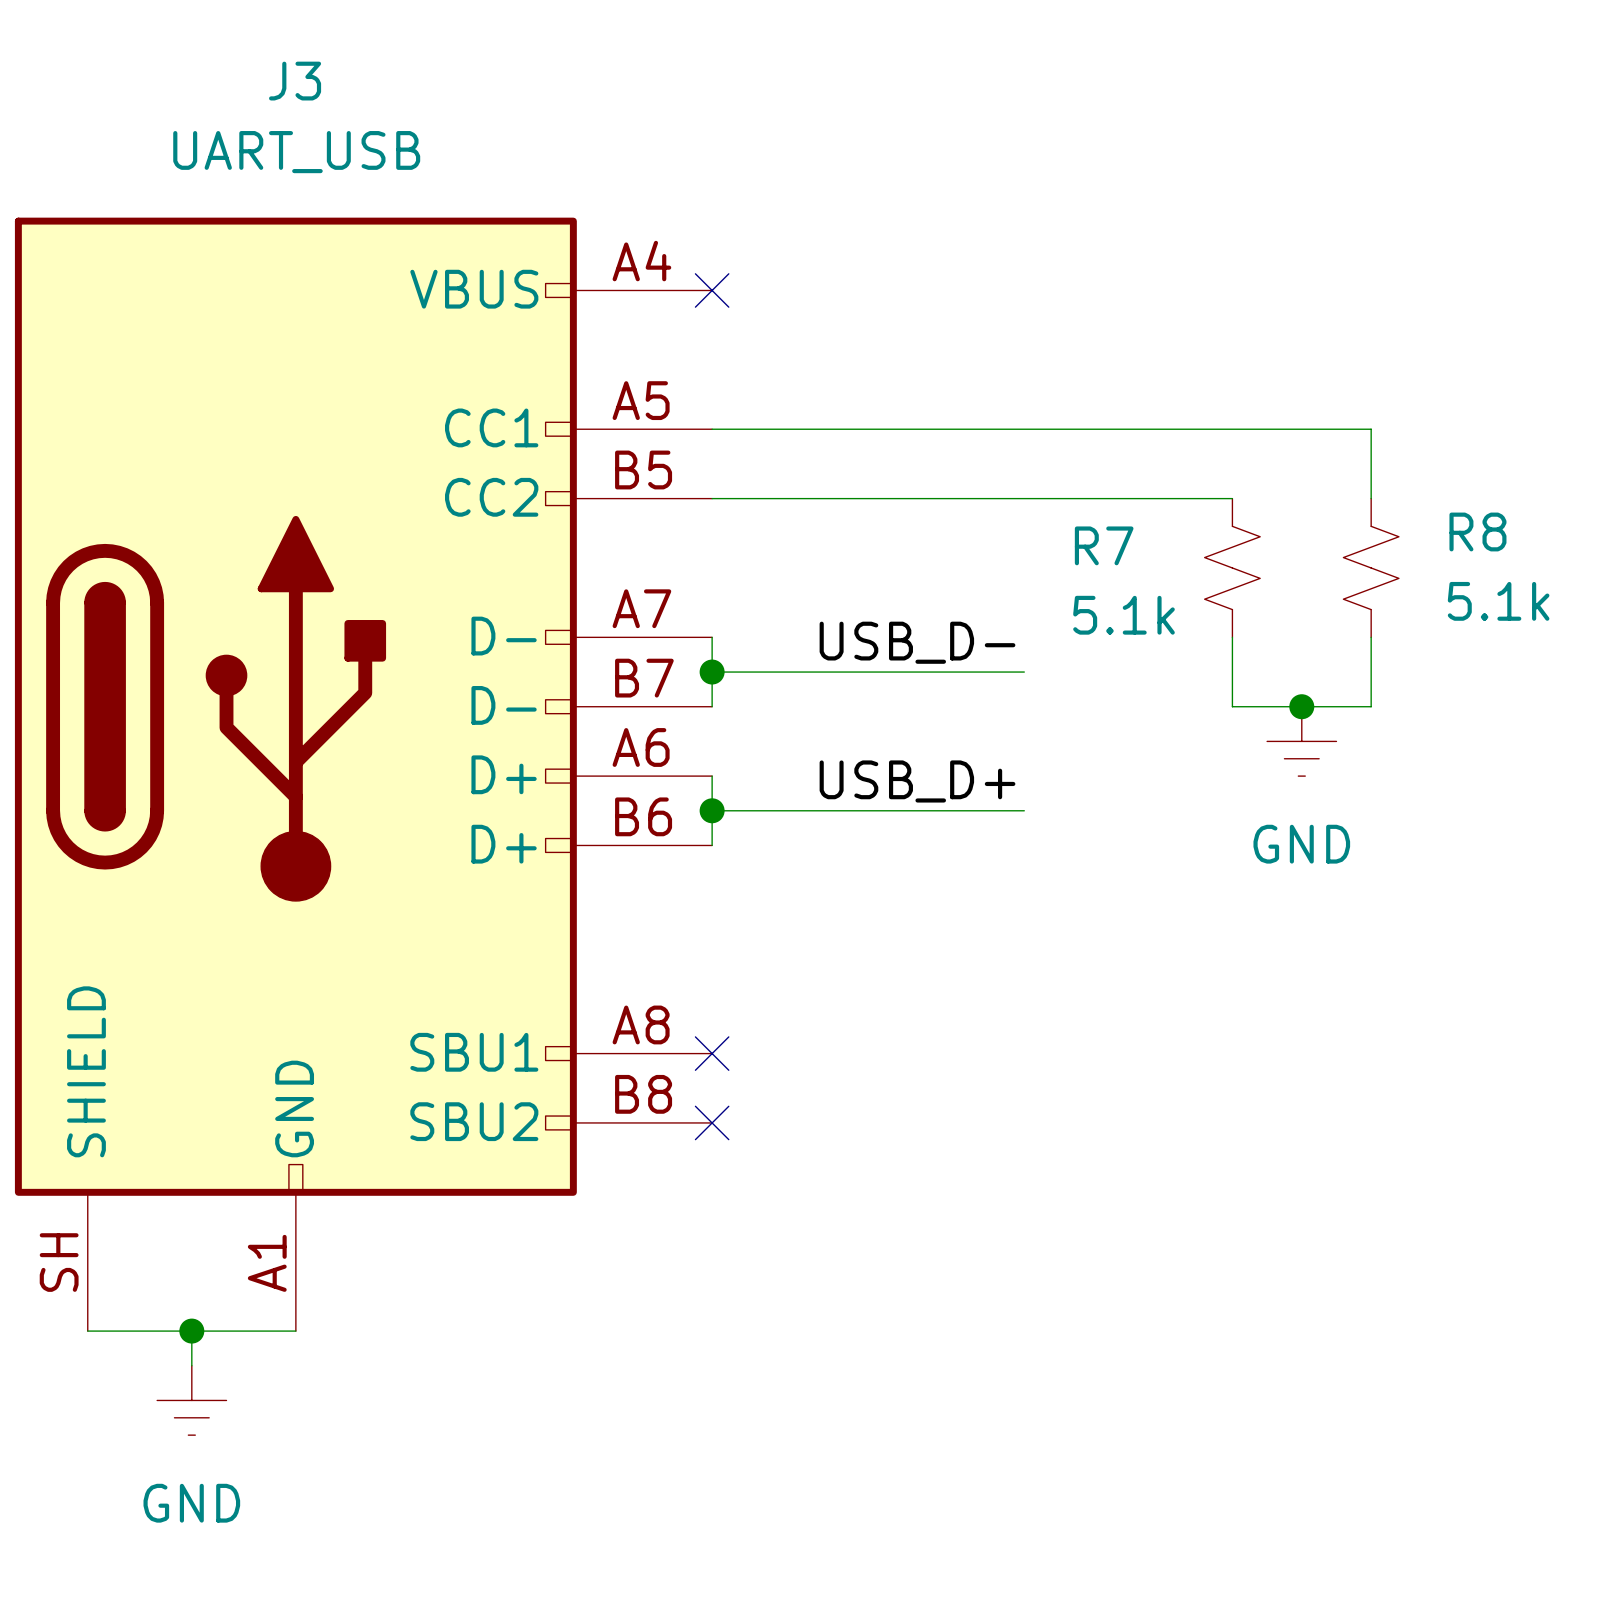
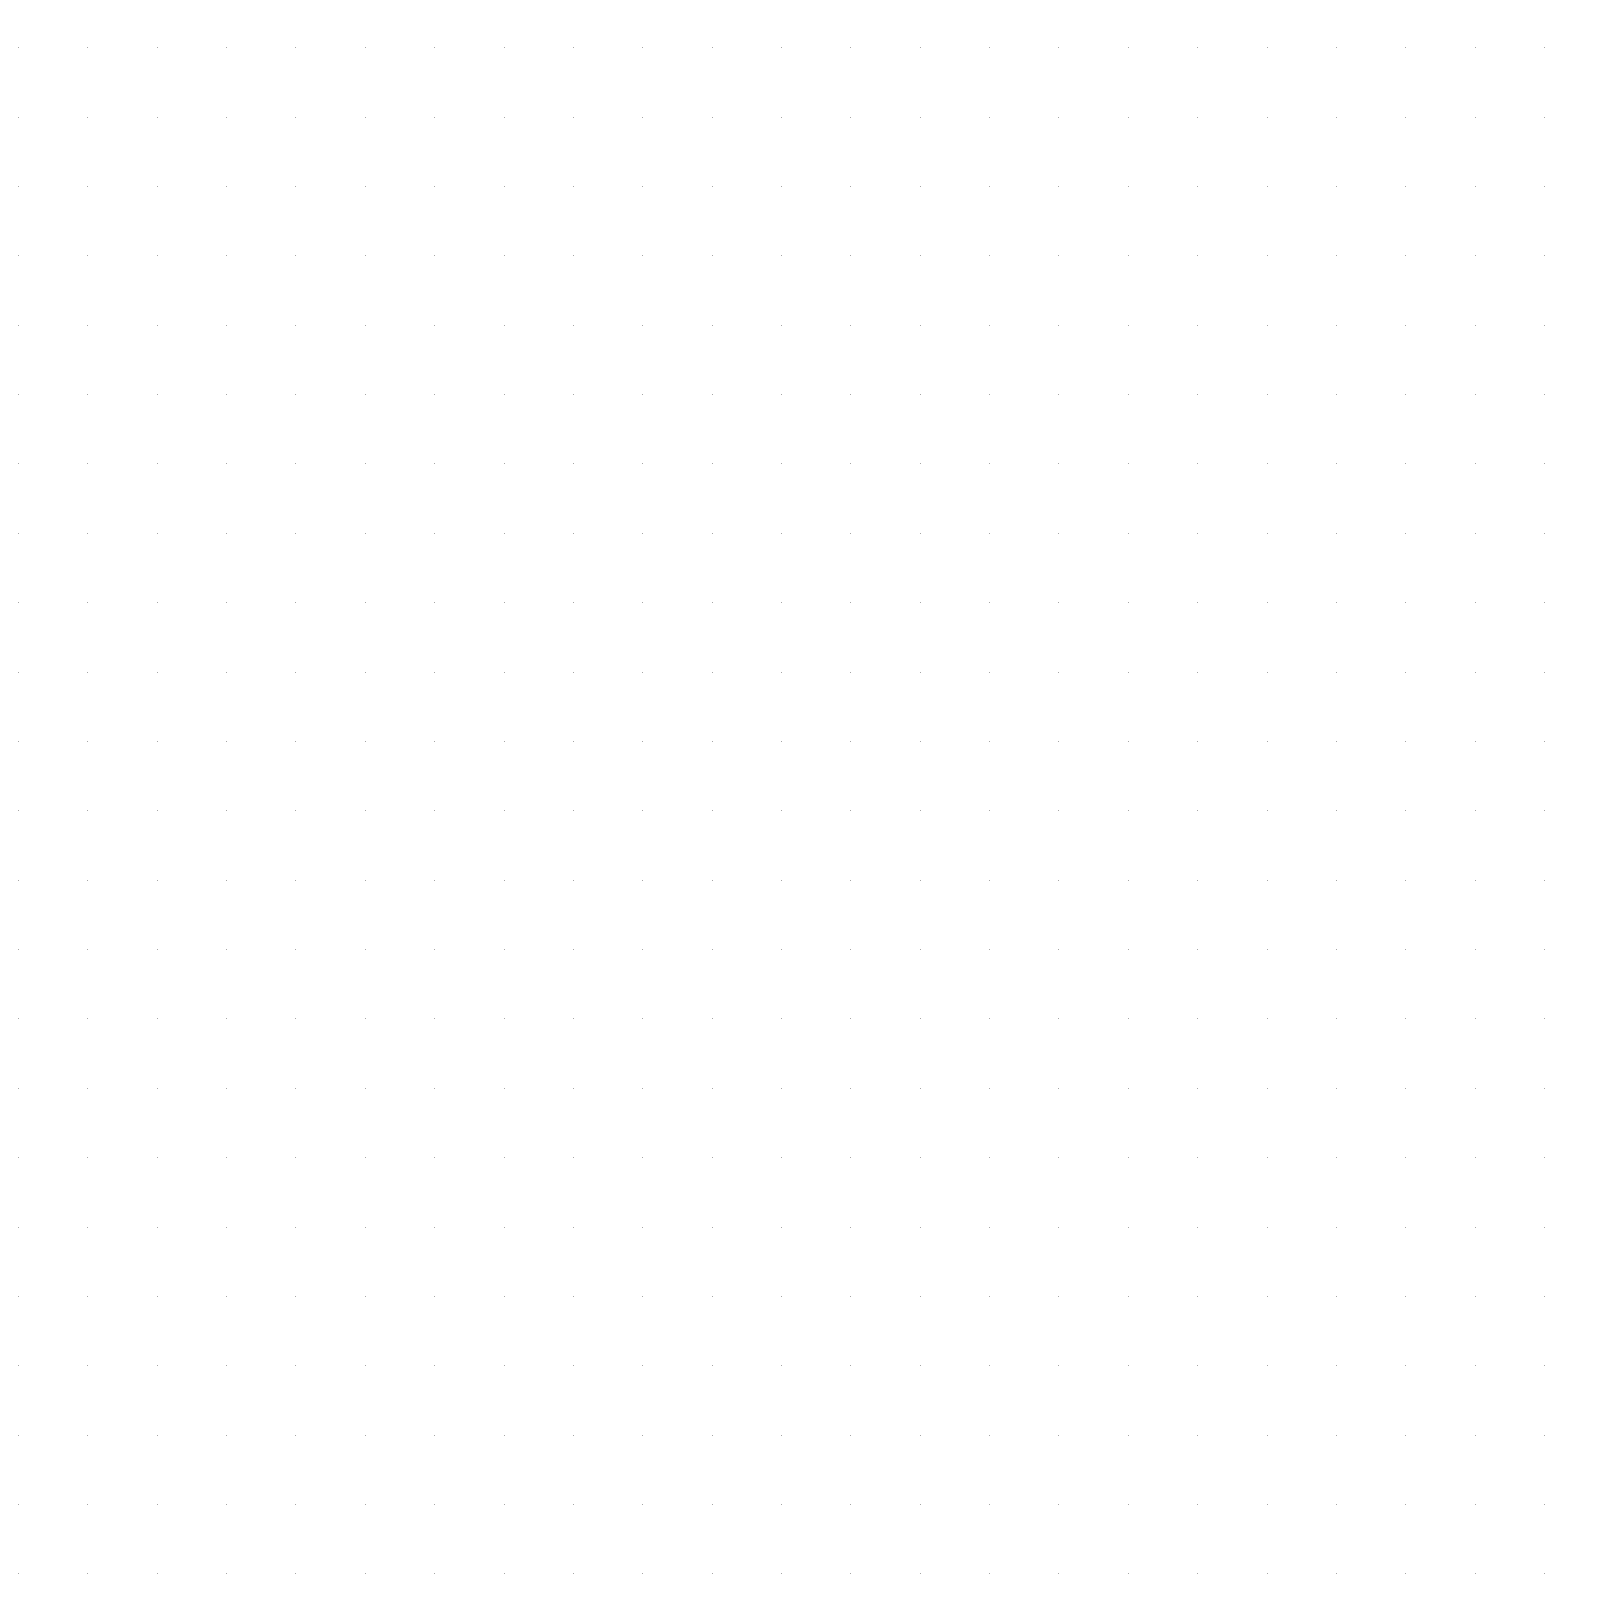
no-connect mark: (712, 290) -> none
wire: (712, 429) (1371, 429) (1371, 498) -> none
wire: (712, 498) (1232, 498) -> none
R7: 5.1k (1232, 567) -> none
R8: 5.1k (1371, 567) -> none
wire: (712, 637) (712, 706) -> none
wire: (1232, 637) (1232, 706) (1371, 706) (1371, 637) -> none
label: USB_D- (917, 642) -> none
wire: (712, 672) (1024, 672) -> none
junction: (712, 672) -> none
junction: (1301, 706) -> none
power symbol: GND (1301, 741) -> none
J3: UART_USB (363, 774) -> none
wire: (712, 776) (712, 845) -> none
label: USB_D+ (917, 781) -> none
wire: (712, 810) (1024, 810) -> none
junction: (712, 810) -> none
no-connect mark: (712, 1053) -> none
no-connect mark: (712, 1122) -> none
wire: (87, 1331) (295, 1331) -> none
wire: (191, 1331) (191, 1365) -> none
junction: (191, 1331) -> none
power symbol: GND (191, 1400) -> none

